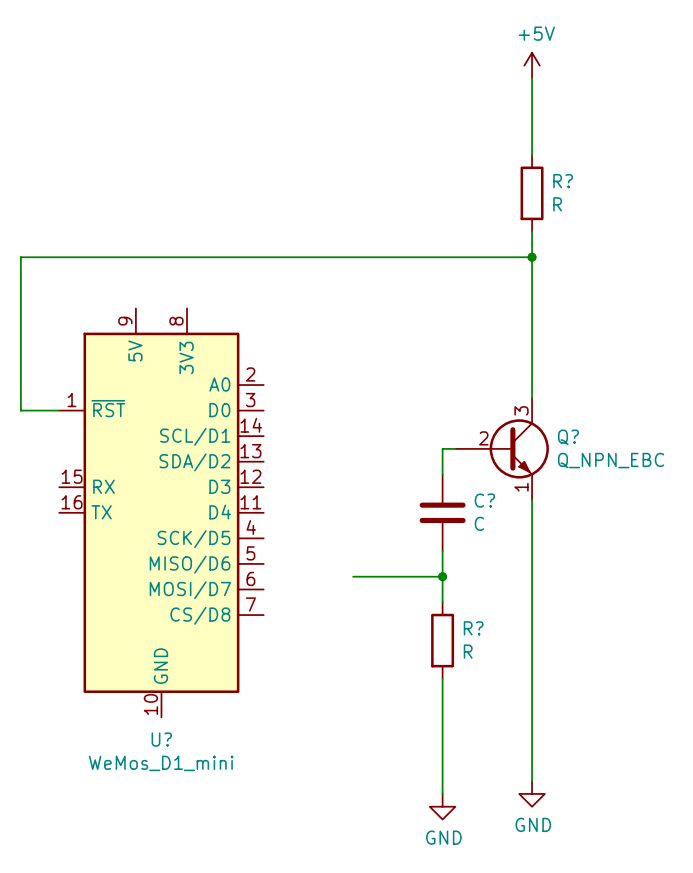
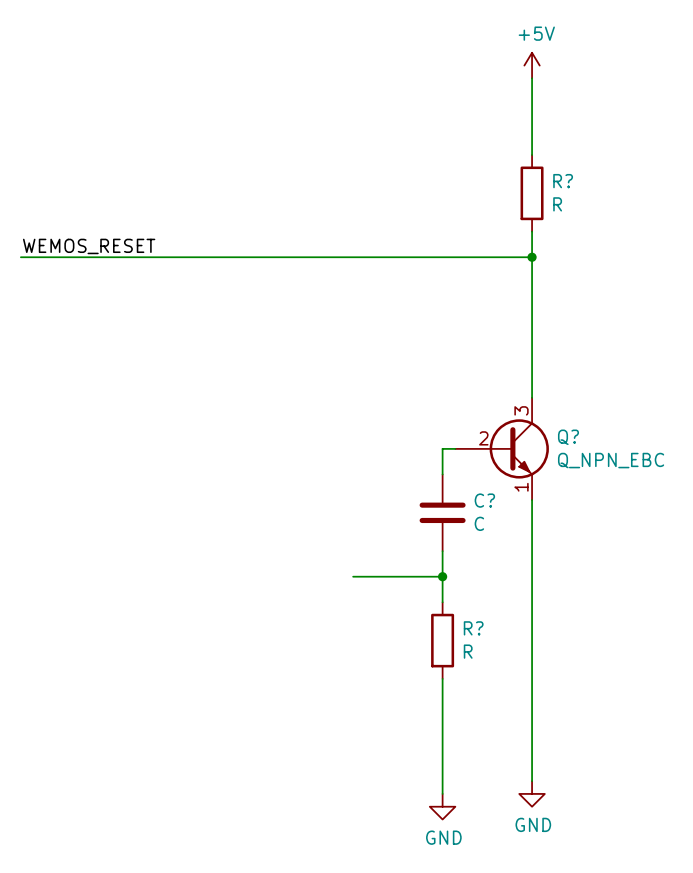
label: none -> WEMOS_RESET (89, 246)
wire: (20, 257) (20, 410) (59, 410) -> none
U?: WeMos_D1_mini (161, 512) -> none

